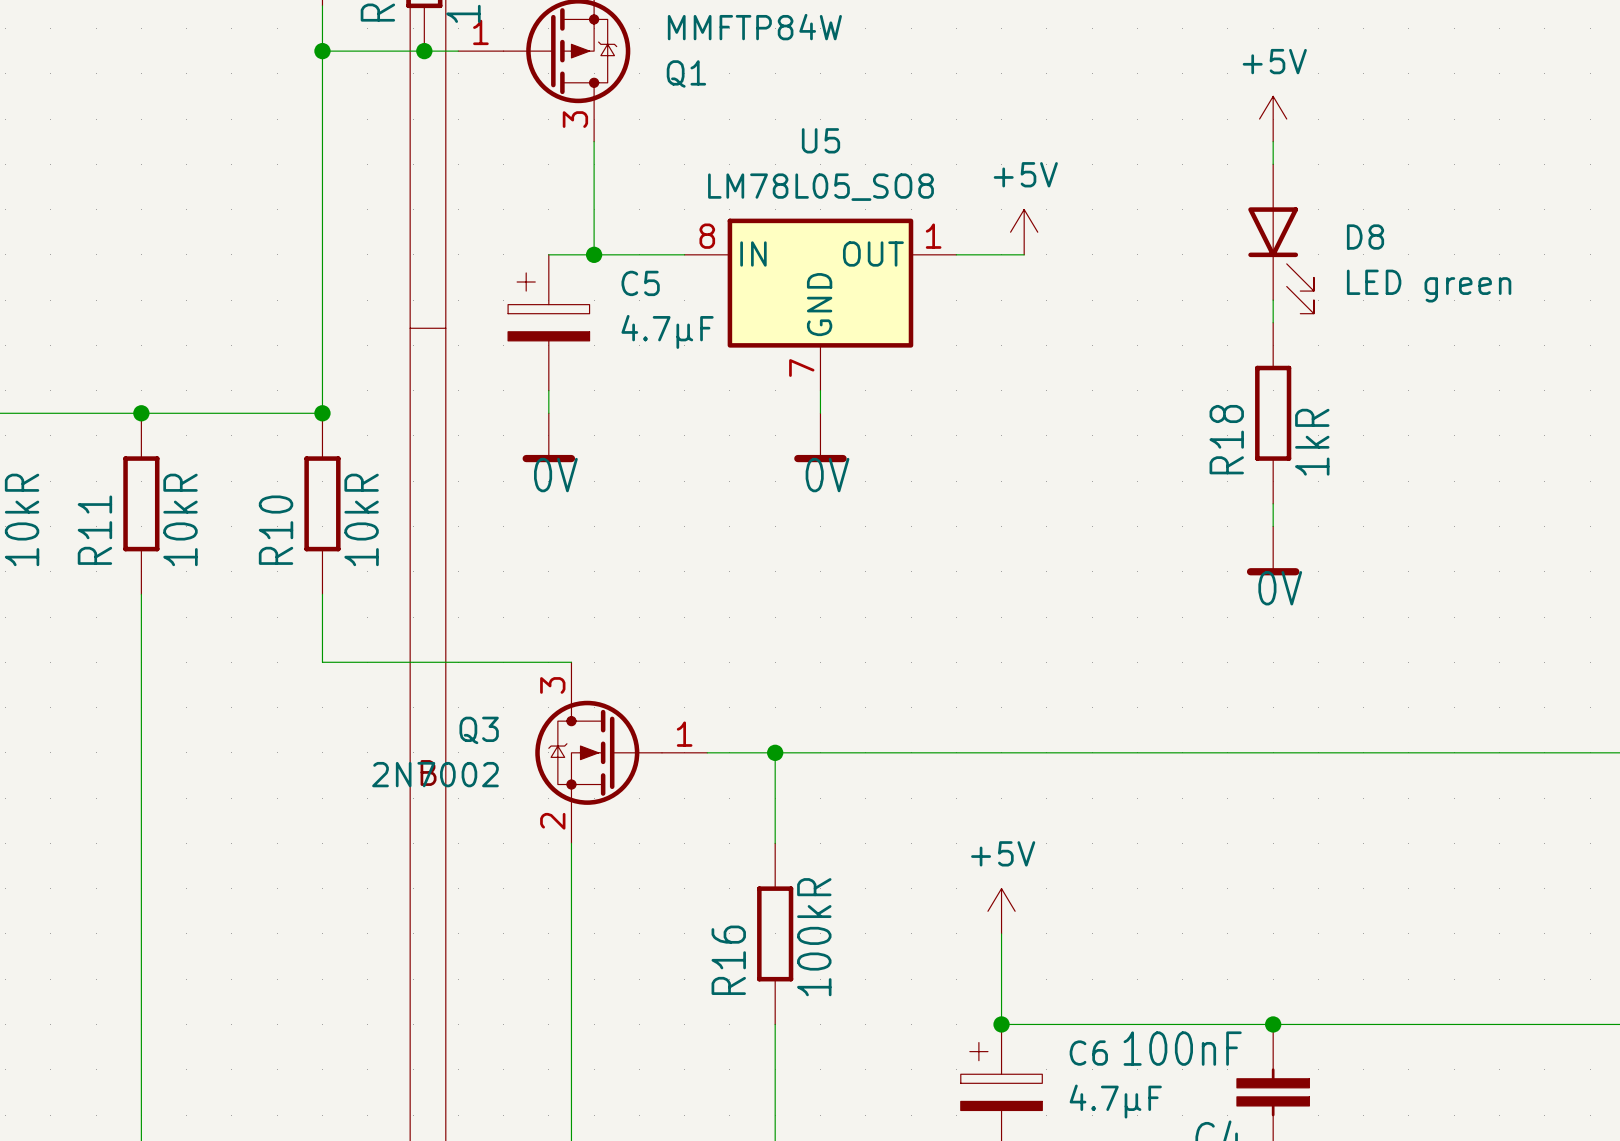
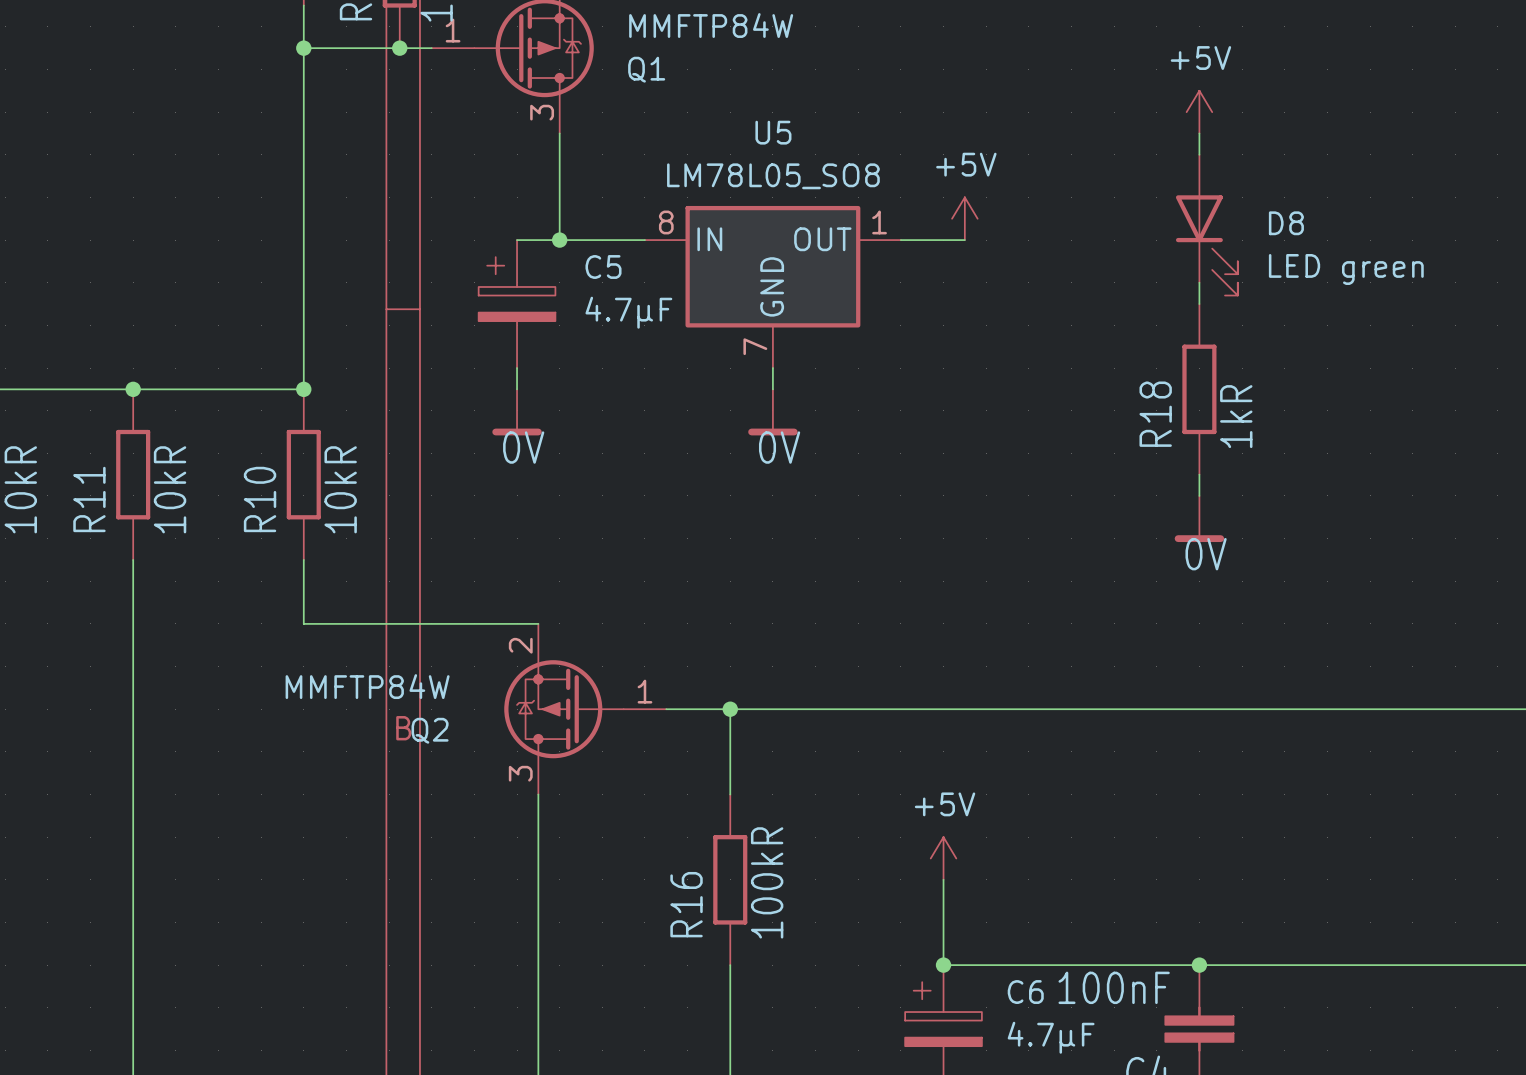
Q3: 2N7002 (621, 752) -> none
Q2: none -> MMFTP84W (585, 709)

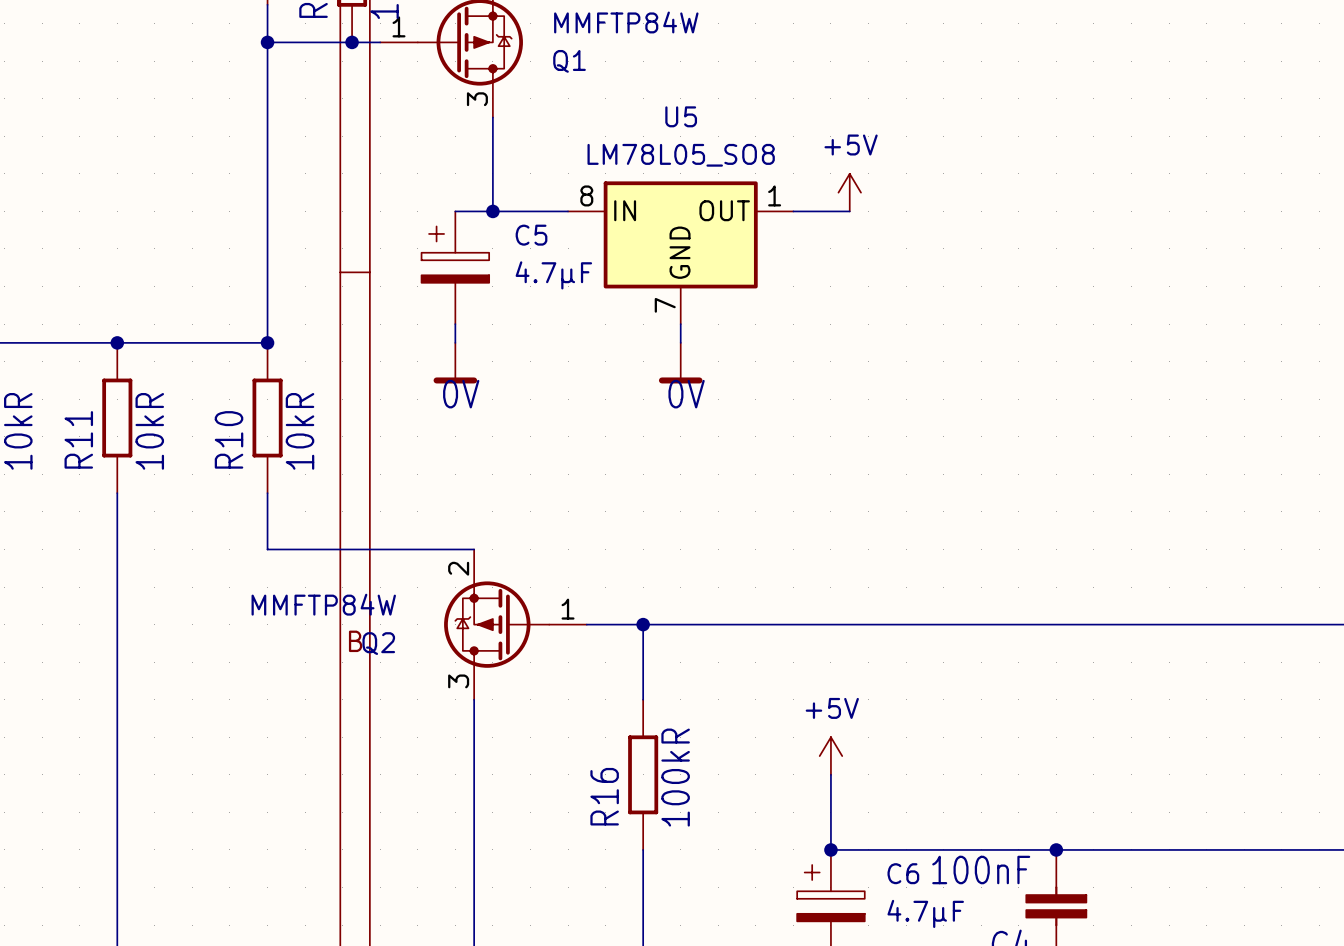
power symbol: +5V (1199, 112) -> none
wire: (1199, 133) (1199, 154) -> none
D8: LED green (1206, 225) -> none
wire: (1199, 282) (1199, 304) -> none
R18: 1kR (1199, 389) -> none
wire: (1199, 474) (1199, 495) -> none
power symbol: 0V (1199, 519) -> none

